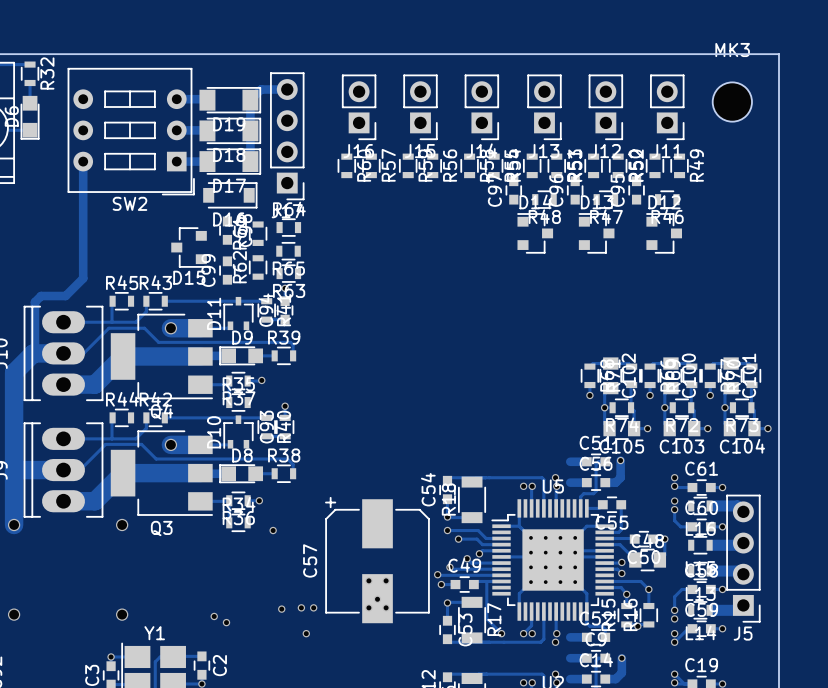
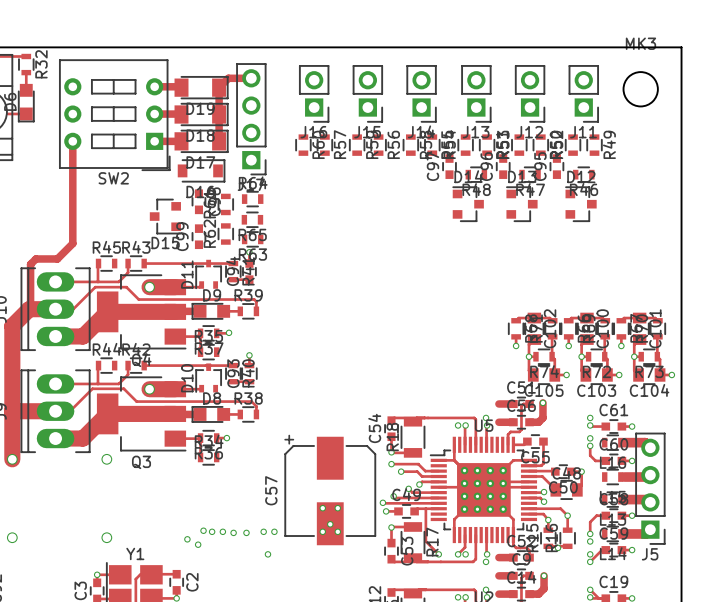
via: (273, 530) -> none
via: none -> (203, 530)
via: none -> (212, 531)
via: none -> (222, 531)
via: none -> (233, 532)

